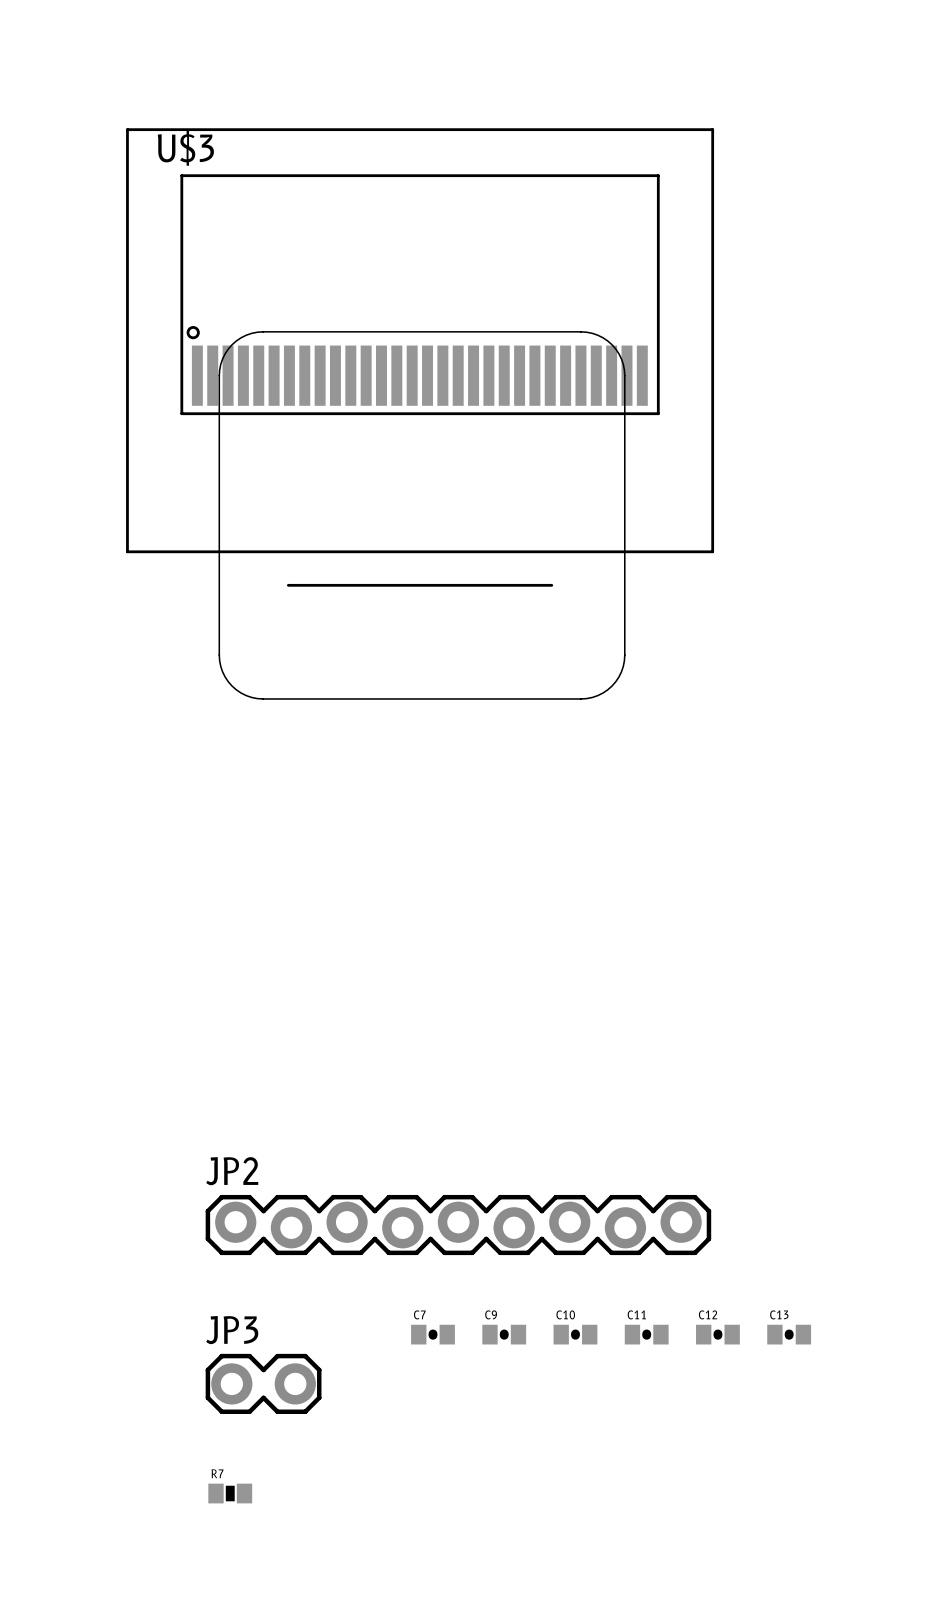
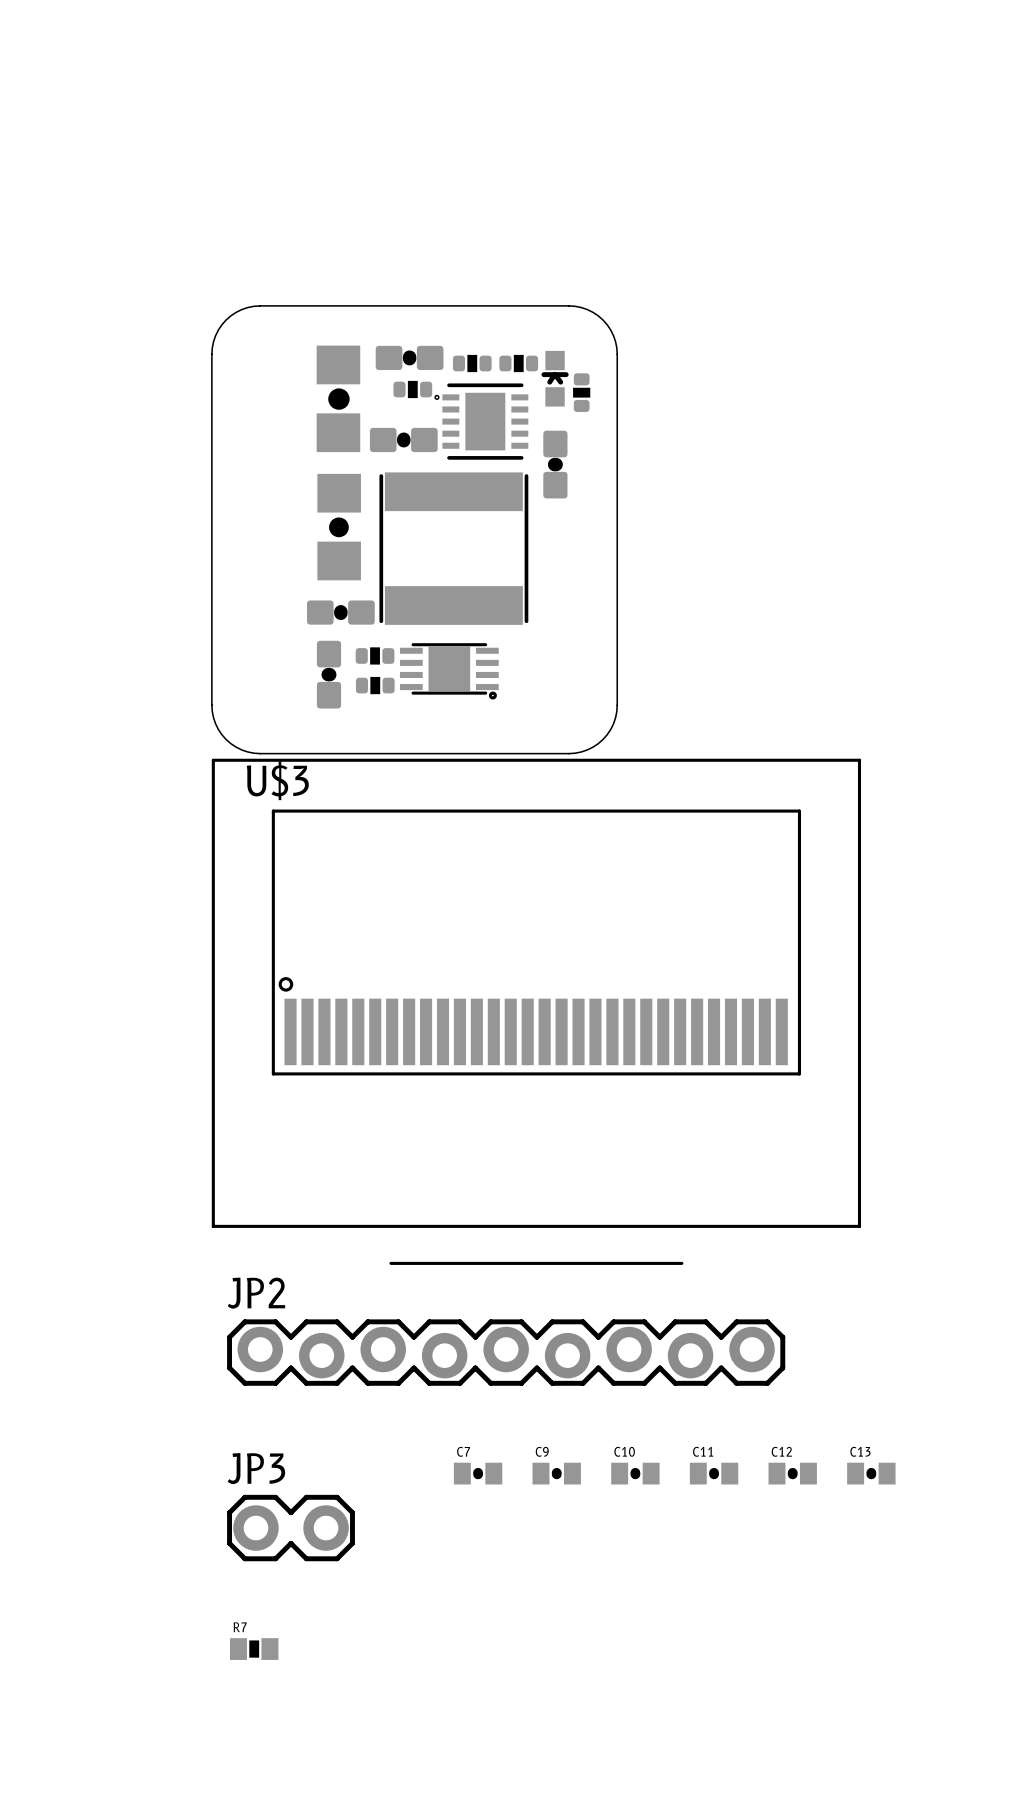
part: none -> (409, 357)
part: none -> (472, 363)
part: none -> (518, 363)
board edge: (263, 331) (580, 331) (597, 335) (611, 344) (621, 358) (624, 375) (624, 655) (621, 671) (611, 686) (597, 695) (580, 698) (263, 698) (246, 695) (232, 686) (222, 671) (219, 655) (219, 369) (225, 353) (236, 340) (246, 335) (263, 331) -> (260, 305) (241, 309) (230, 315) (218, 330) (212, 347) (211, 705) (215, 723) (221, 734) (230, 743) (241, 749) (260, 753) (568, 753) (587, 749) (598, 743) (607, 734) (613, 723) (617, 705) (617, 354) (613, 335) (607, 324) (598, 315) (587, 309) (568, 305) (260, 305)
part: none -> (555, 378)
drawing: none -> [328, 388, 350, 410]
part: none -> (412, 389)
part: none -> (581, 392)
U$3 position: (420, 357) -> (536, 1011)
part: none -> (338, 398)
part: none -> (481, 421)
part: none -> (403, 439)
part: none -> (555, 464)
drawing: none -> [329, 517, 349, 538]
part: none -> (339, 527)
part: none -> (453, 548)
part: none -> (340, 612)
part: none -> (375, 655)
part: none -> (449, 671)
part: none -> (328, 674)
part: none -> (375, 685)

